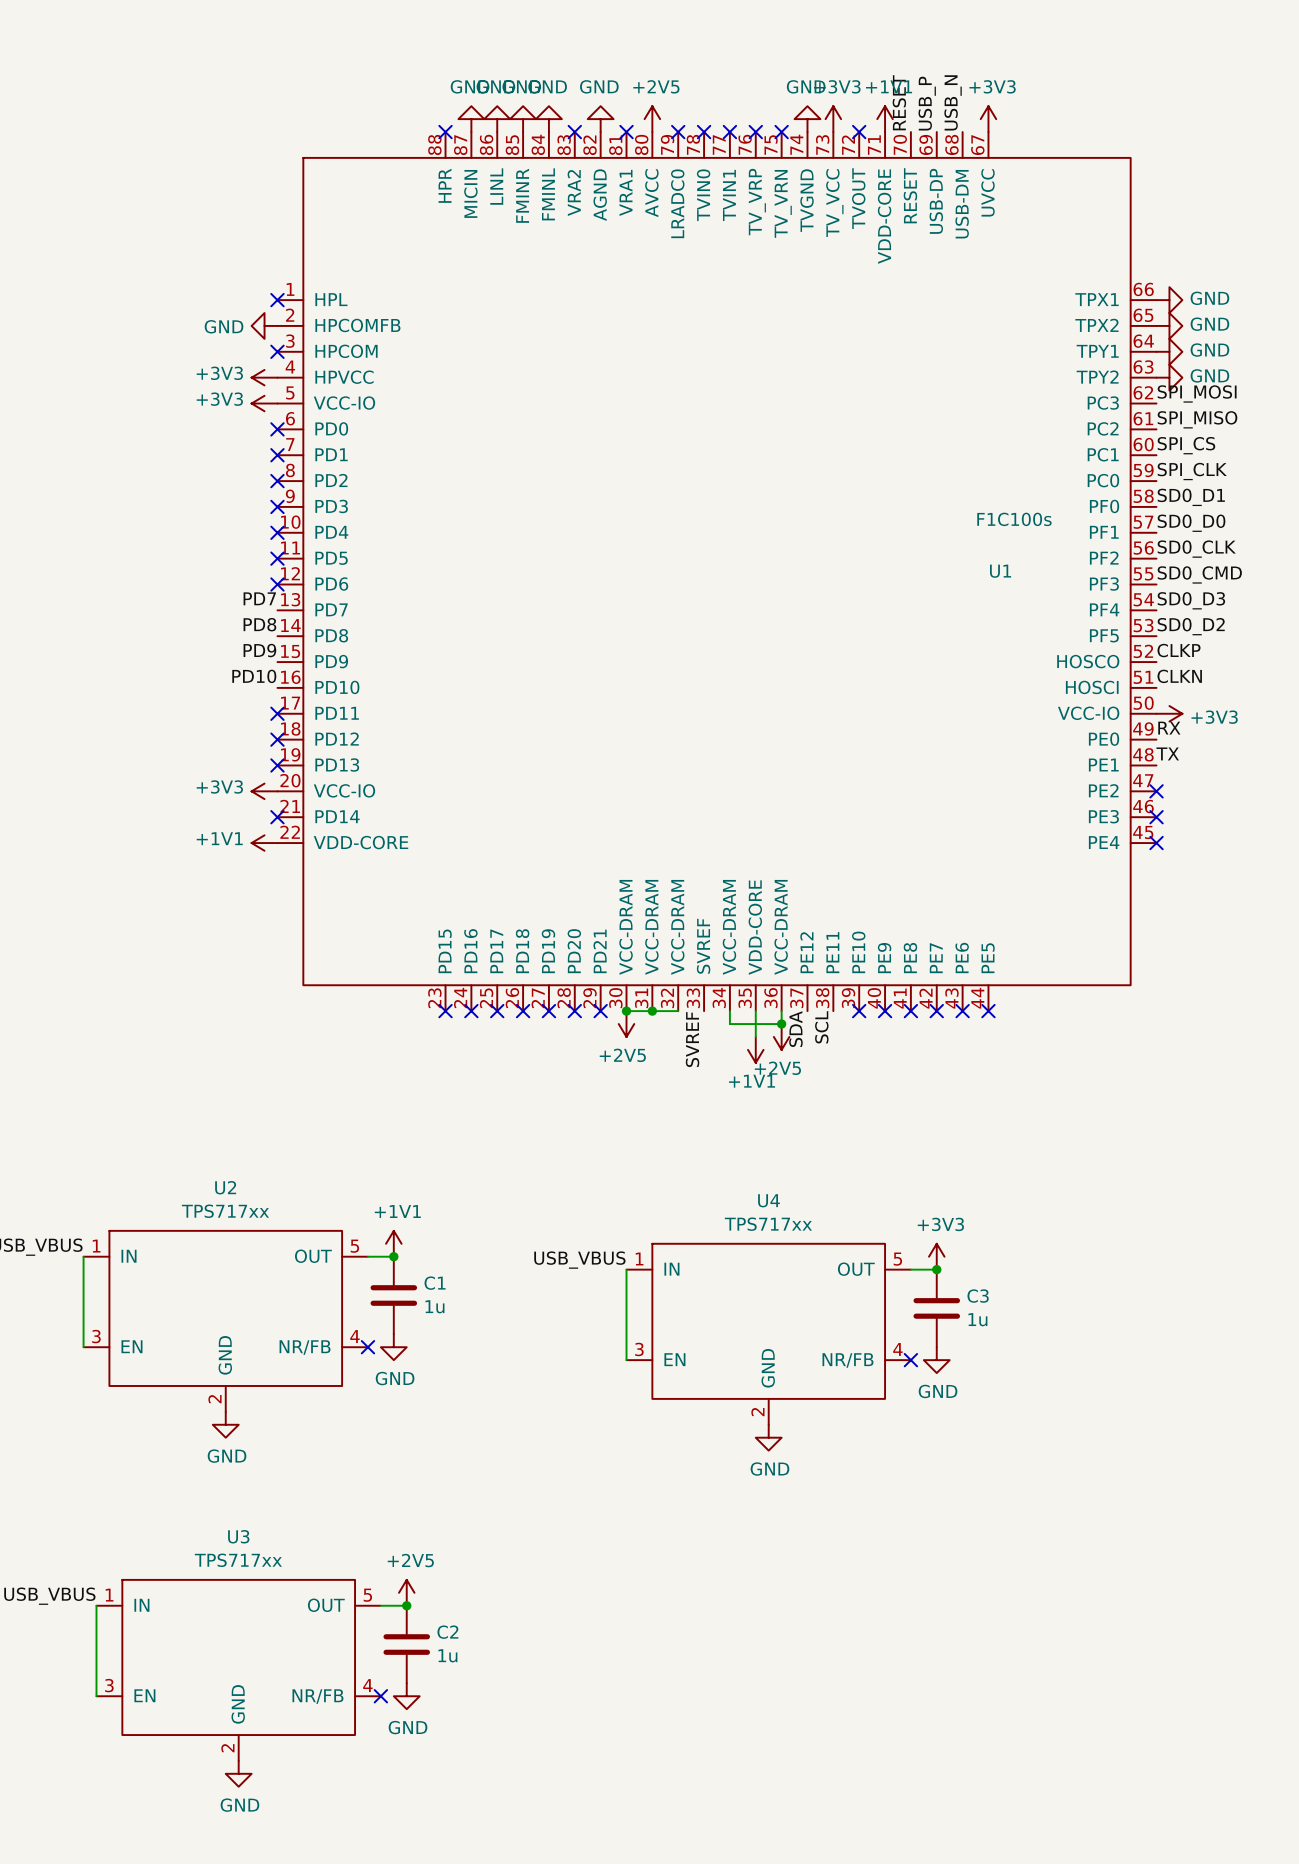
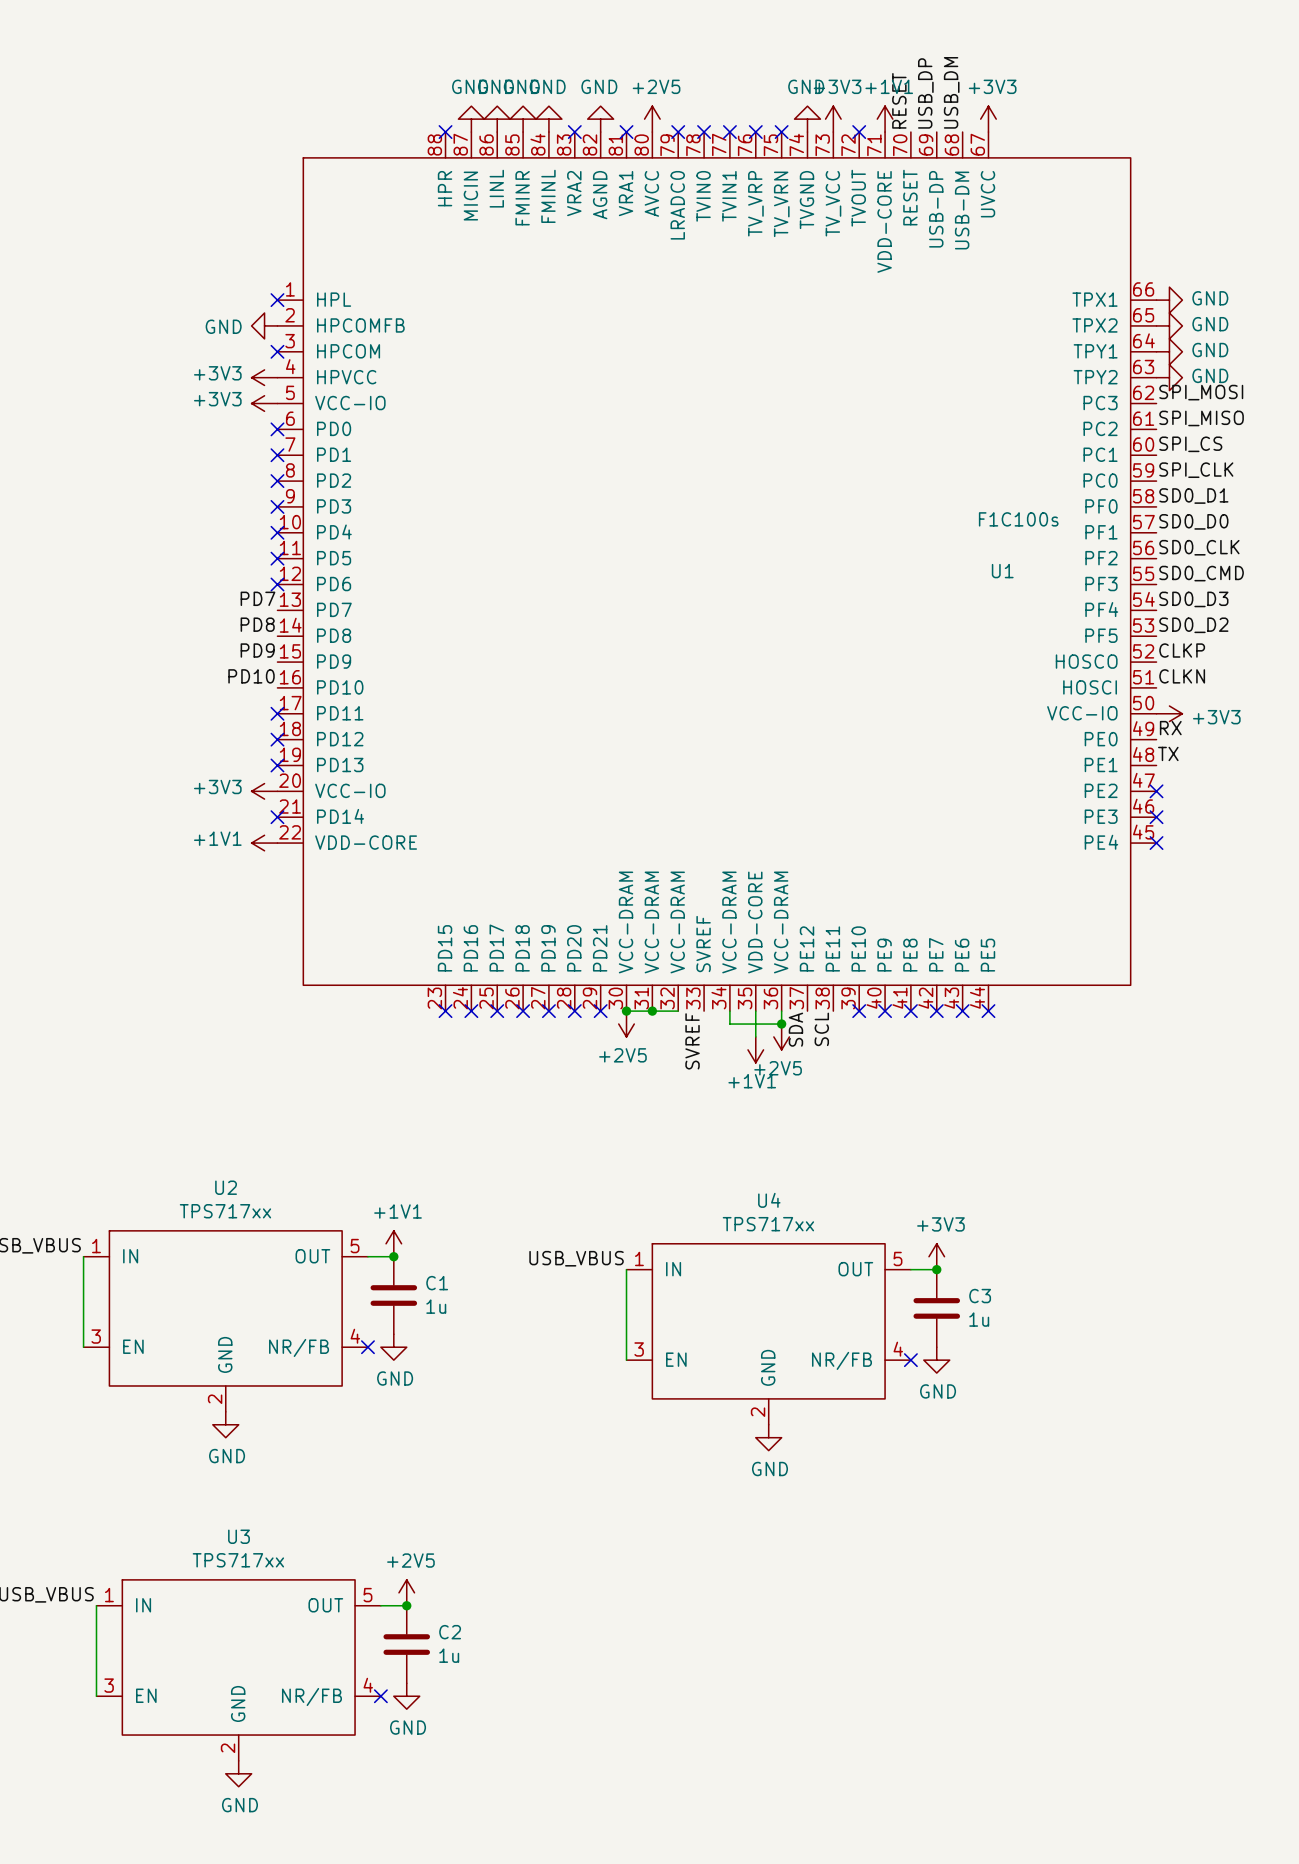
label: USB_N (953, 102) -> USB_DM (951, 92)
label: USB_P (927, 103) -> USB_DP (925, 93)

